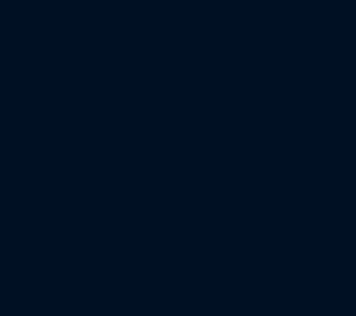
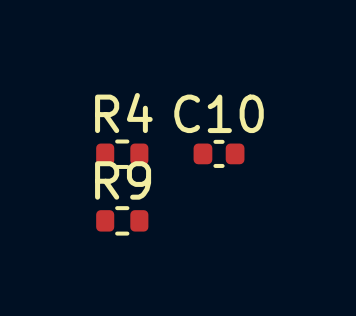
C10: none -> (219, 153)
R4: none -> (122, 154)
R9: none -> (122, 220)

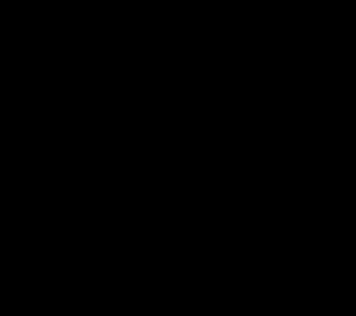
C10: (219, 153) -> none
R4: (122, 154) -> none
R9: (122, 220) -> none

